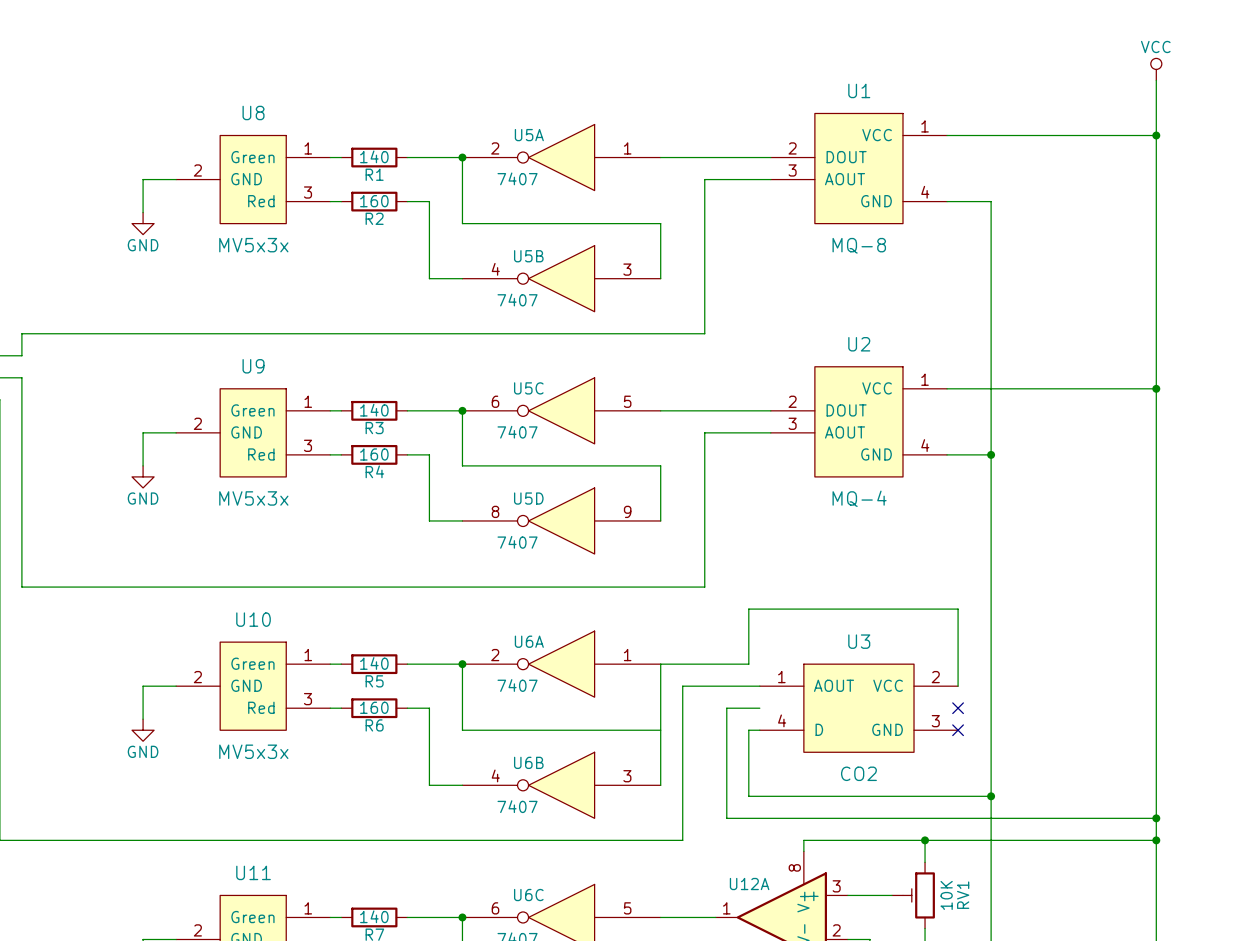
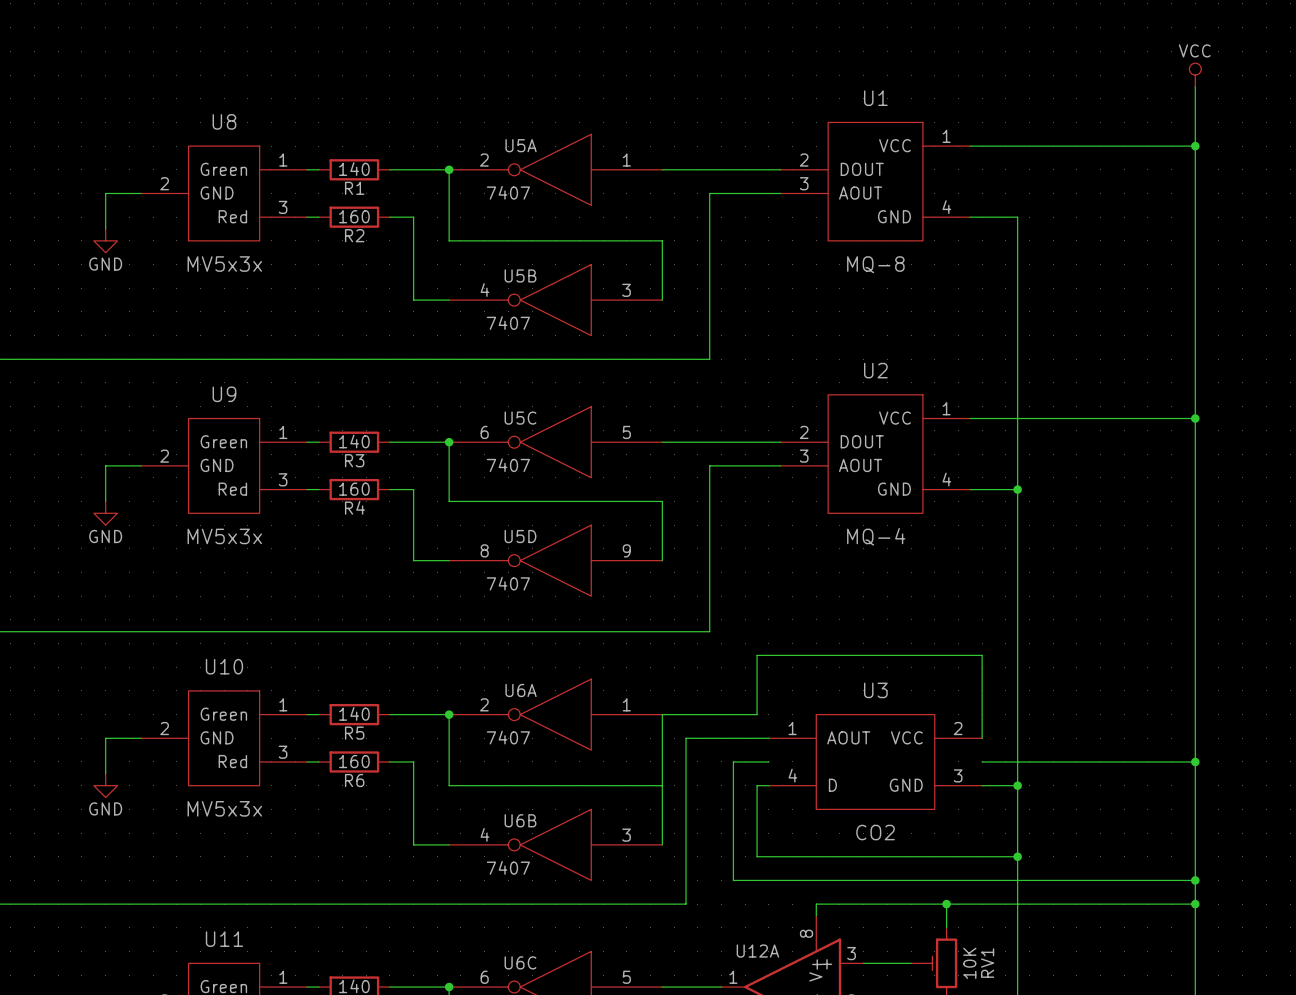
wire: none -> (982, 761) (1195, 761)
no-connect mark: (958, 708) -> none
junction: none -> (1195, 761)
wire: none -> (982, 785) (1017, 785)
no-connect mark: (958, 730) -> none
junction: none -> (1017, 785)

